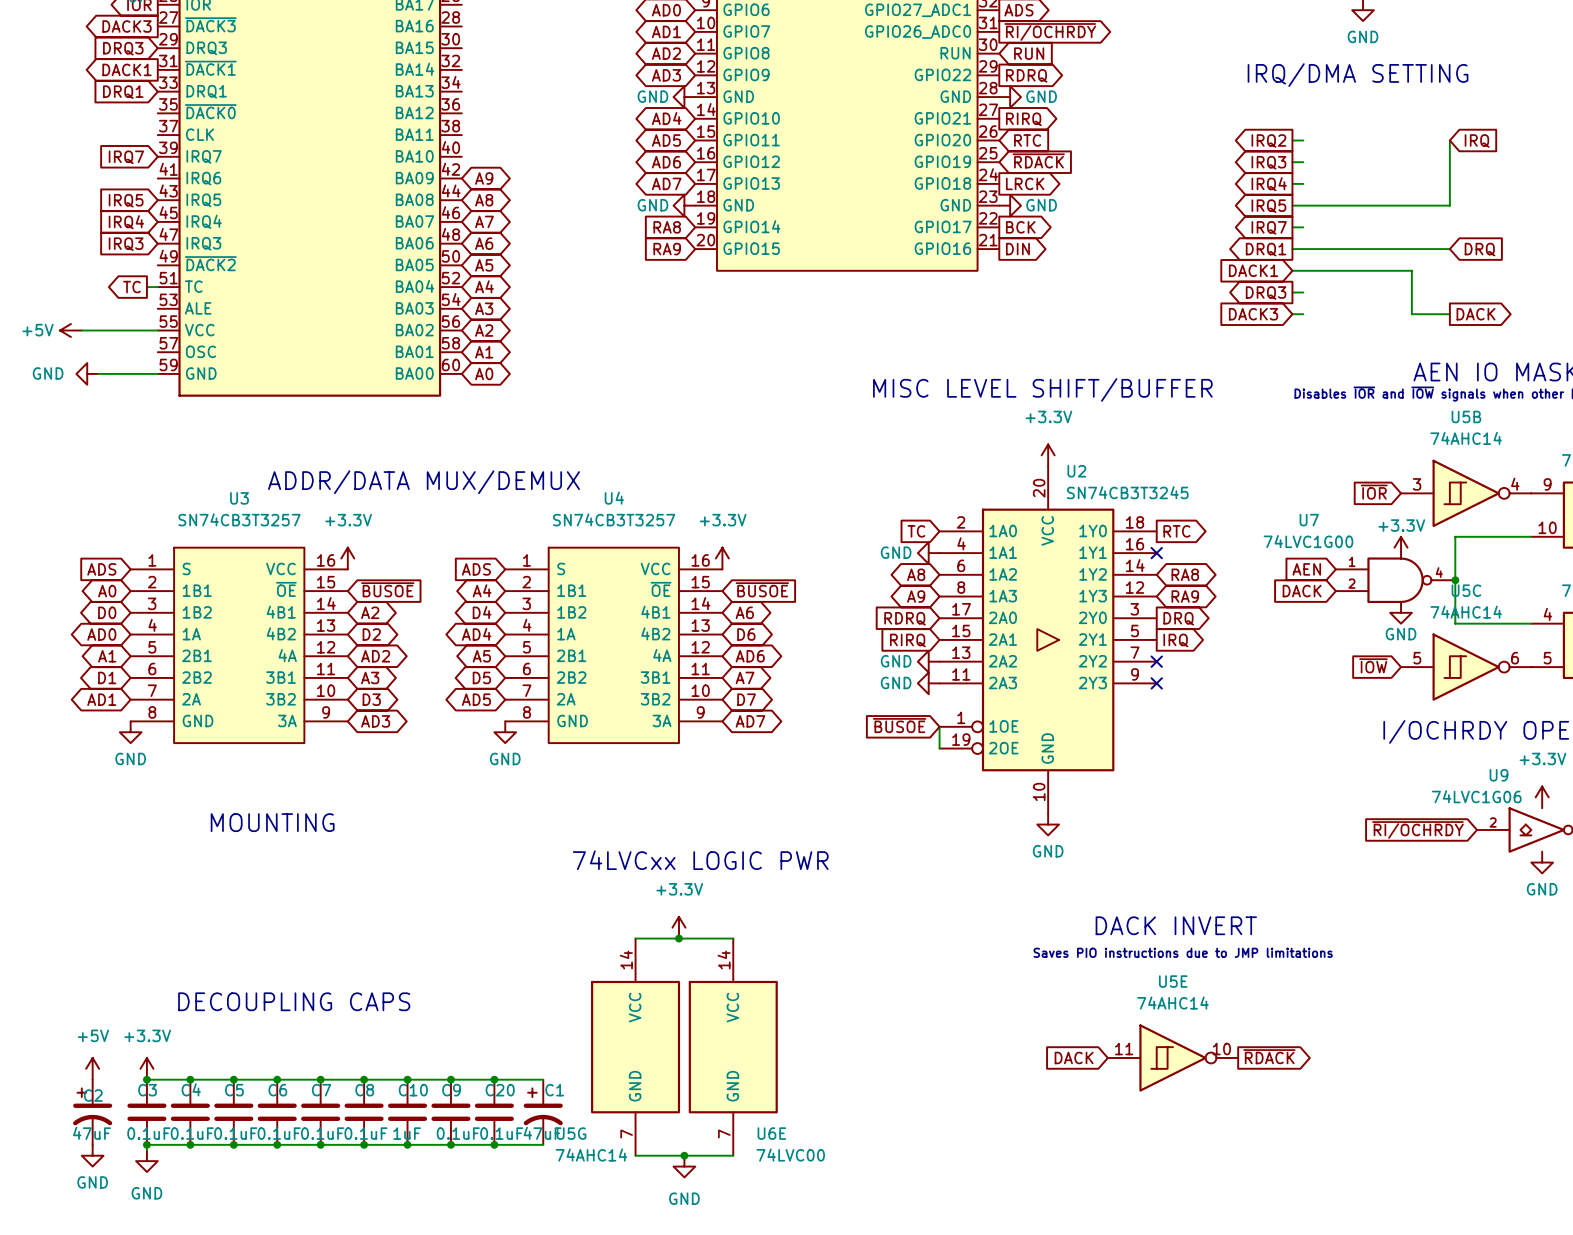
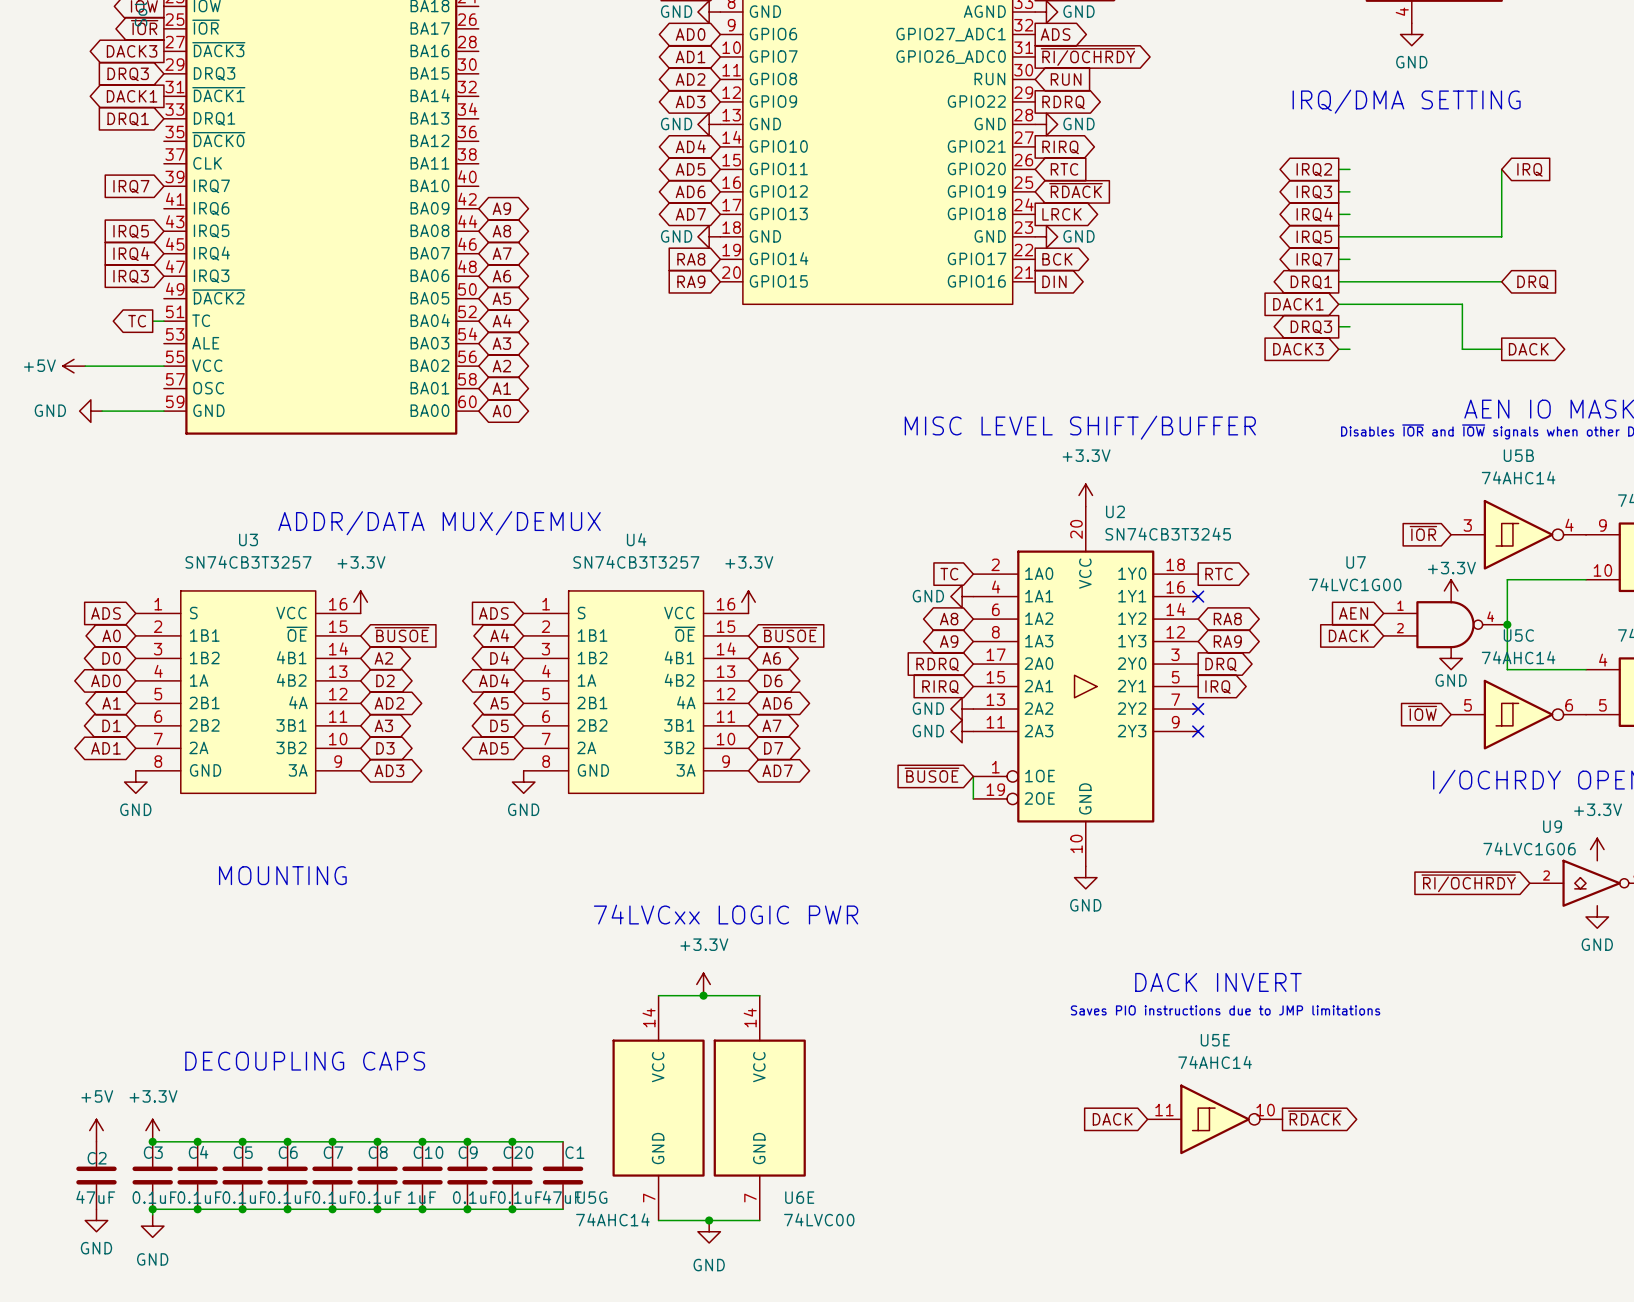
C2 symbol: [73, 1079, 113, 1145] -> [76, 1141, 117, 1210]
C1 symbol: [523, 1079, 563, 1145] -> [542, 1141, 584, 1210]

